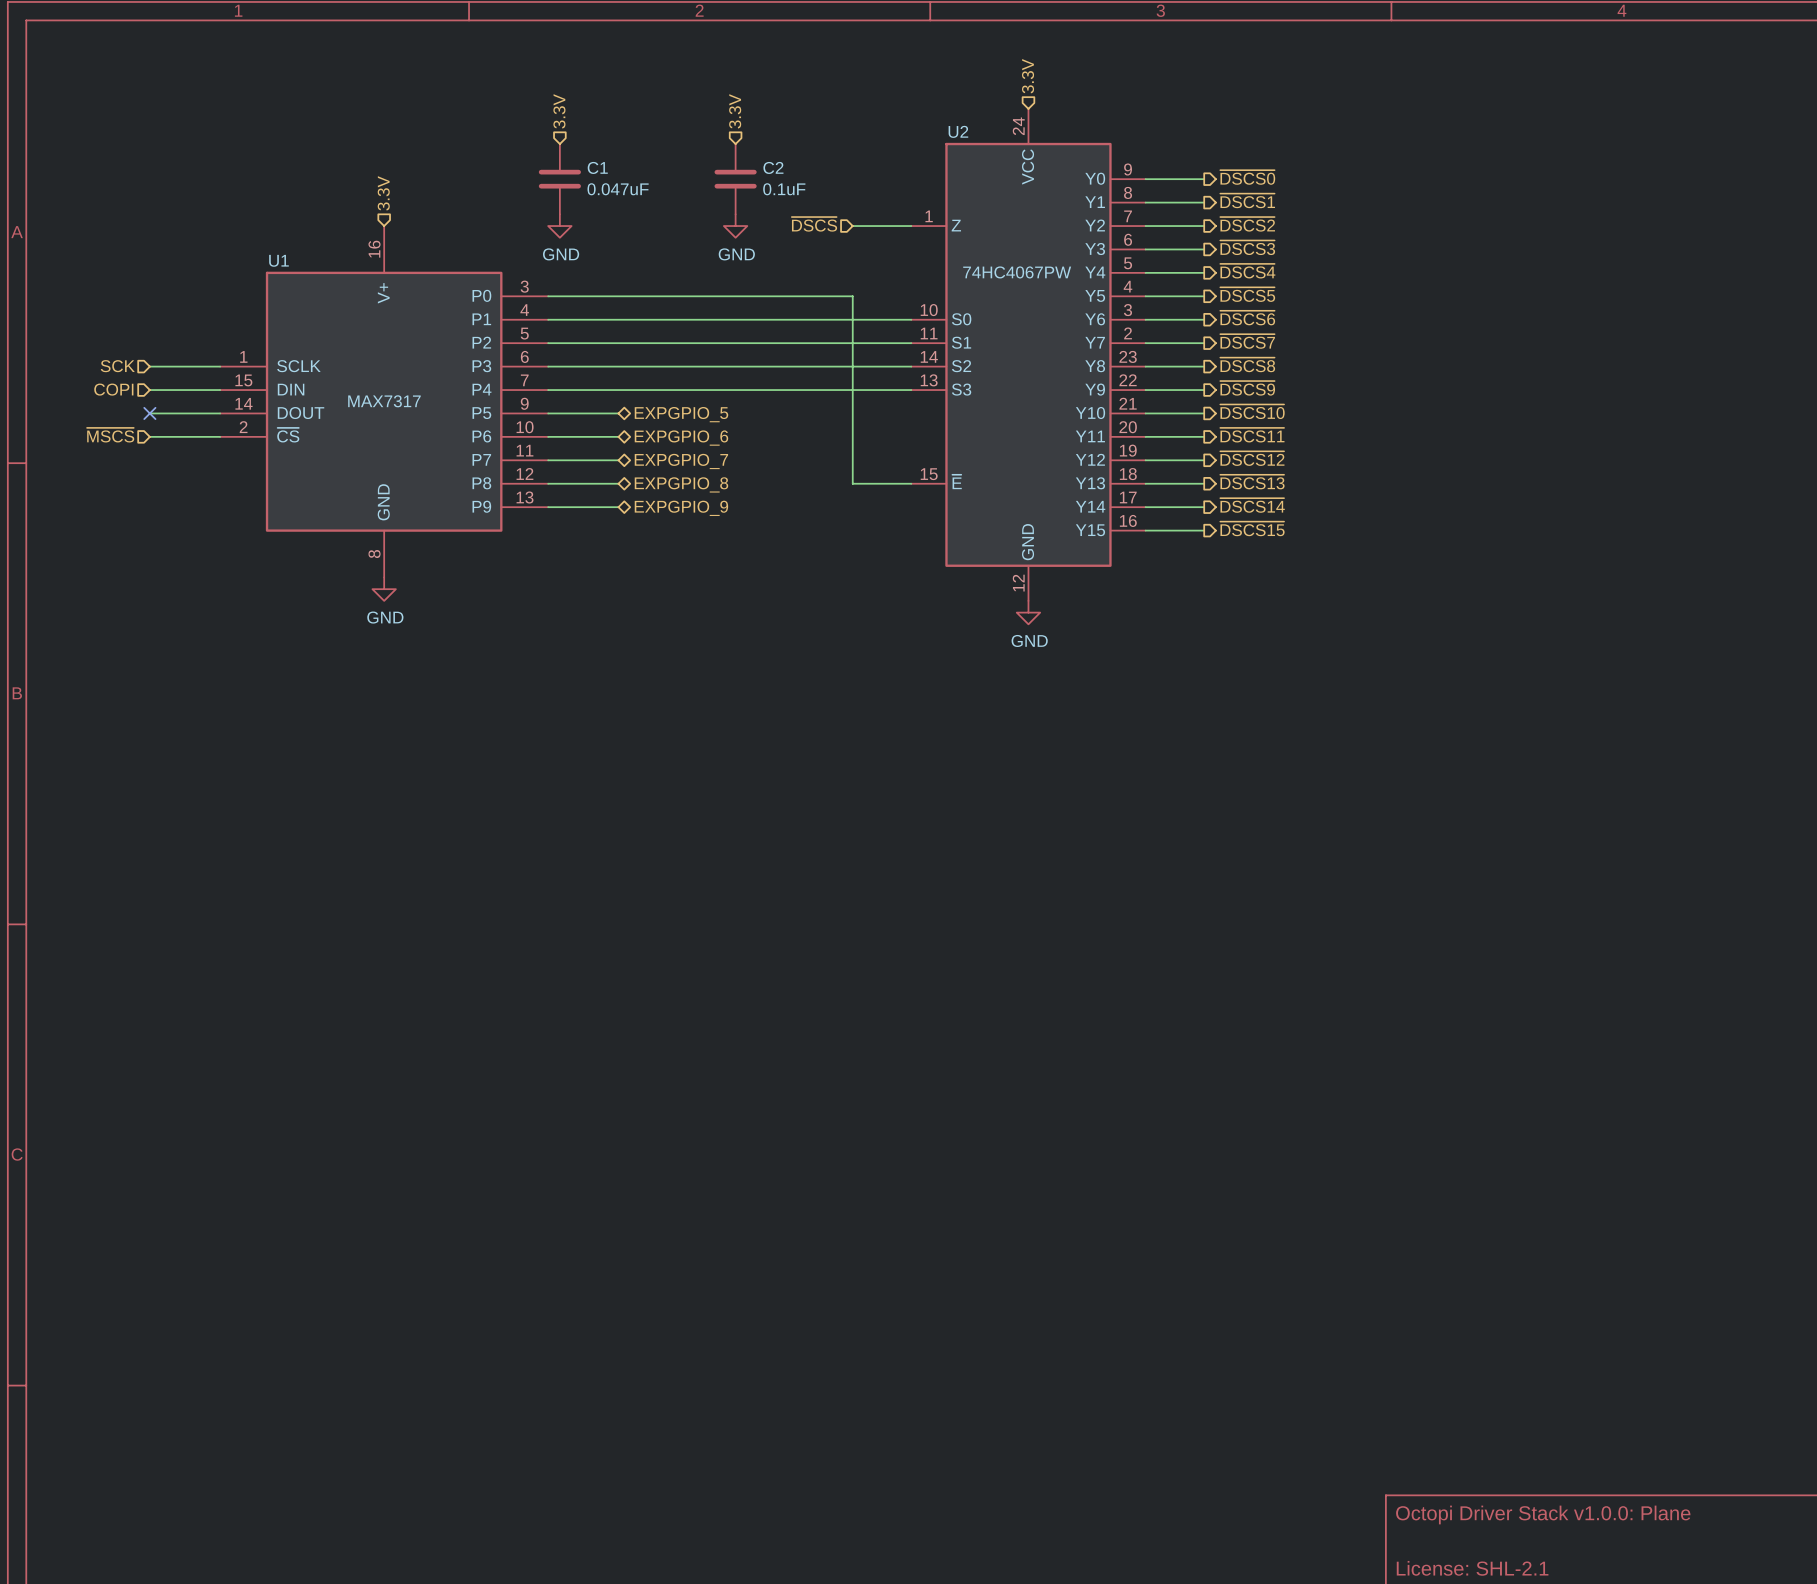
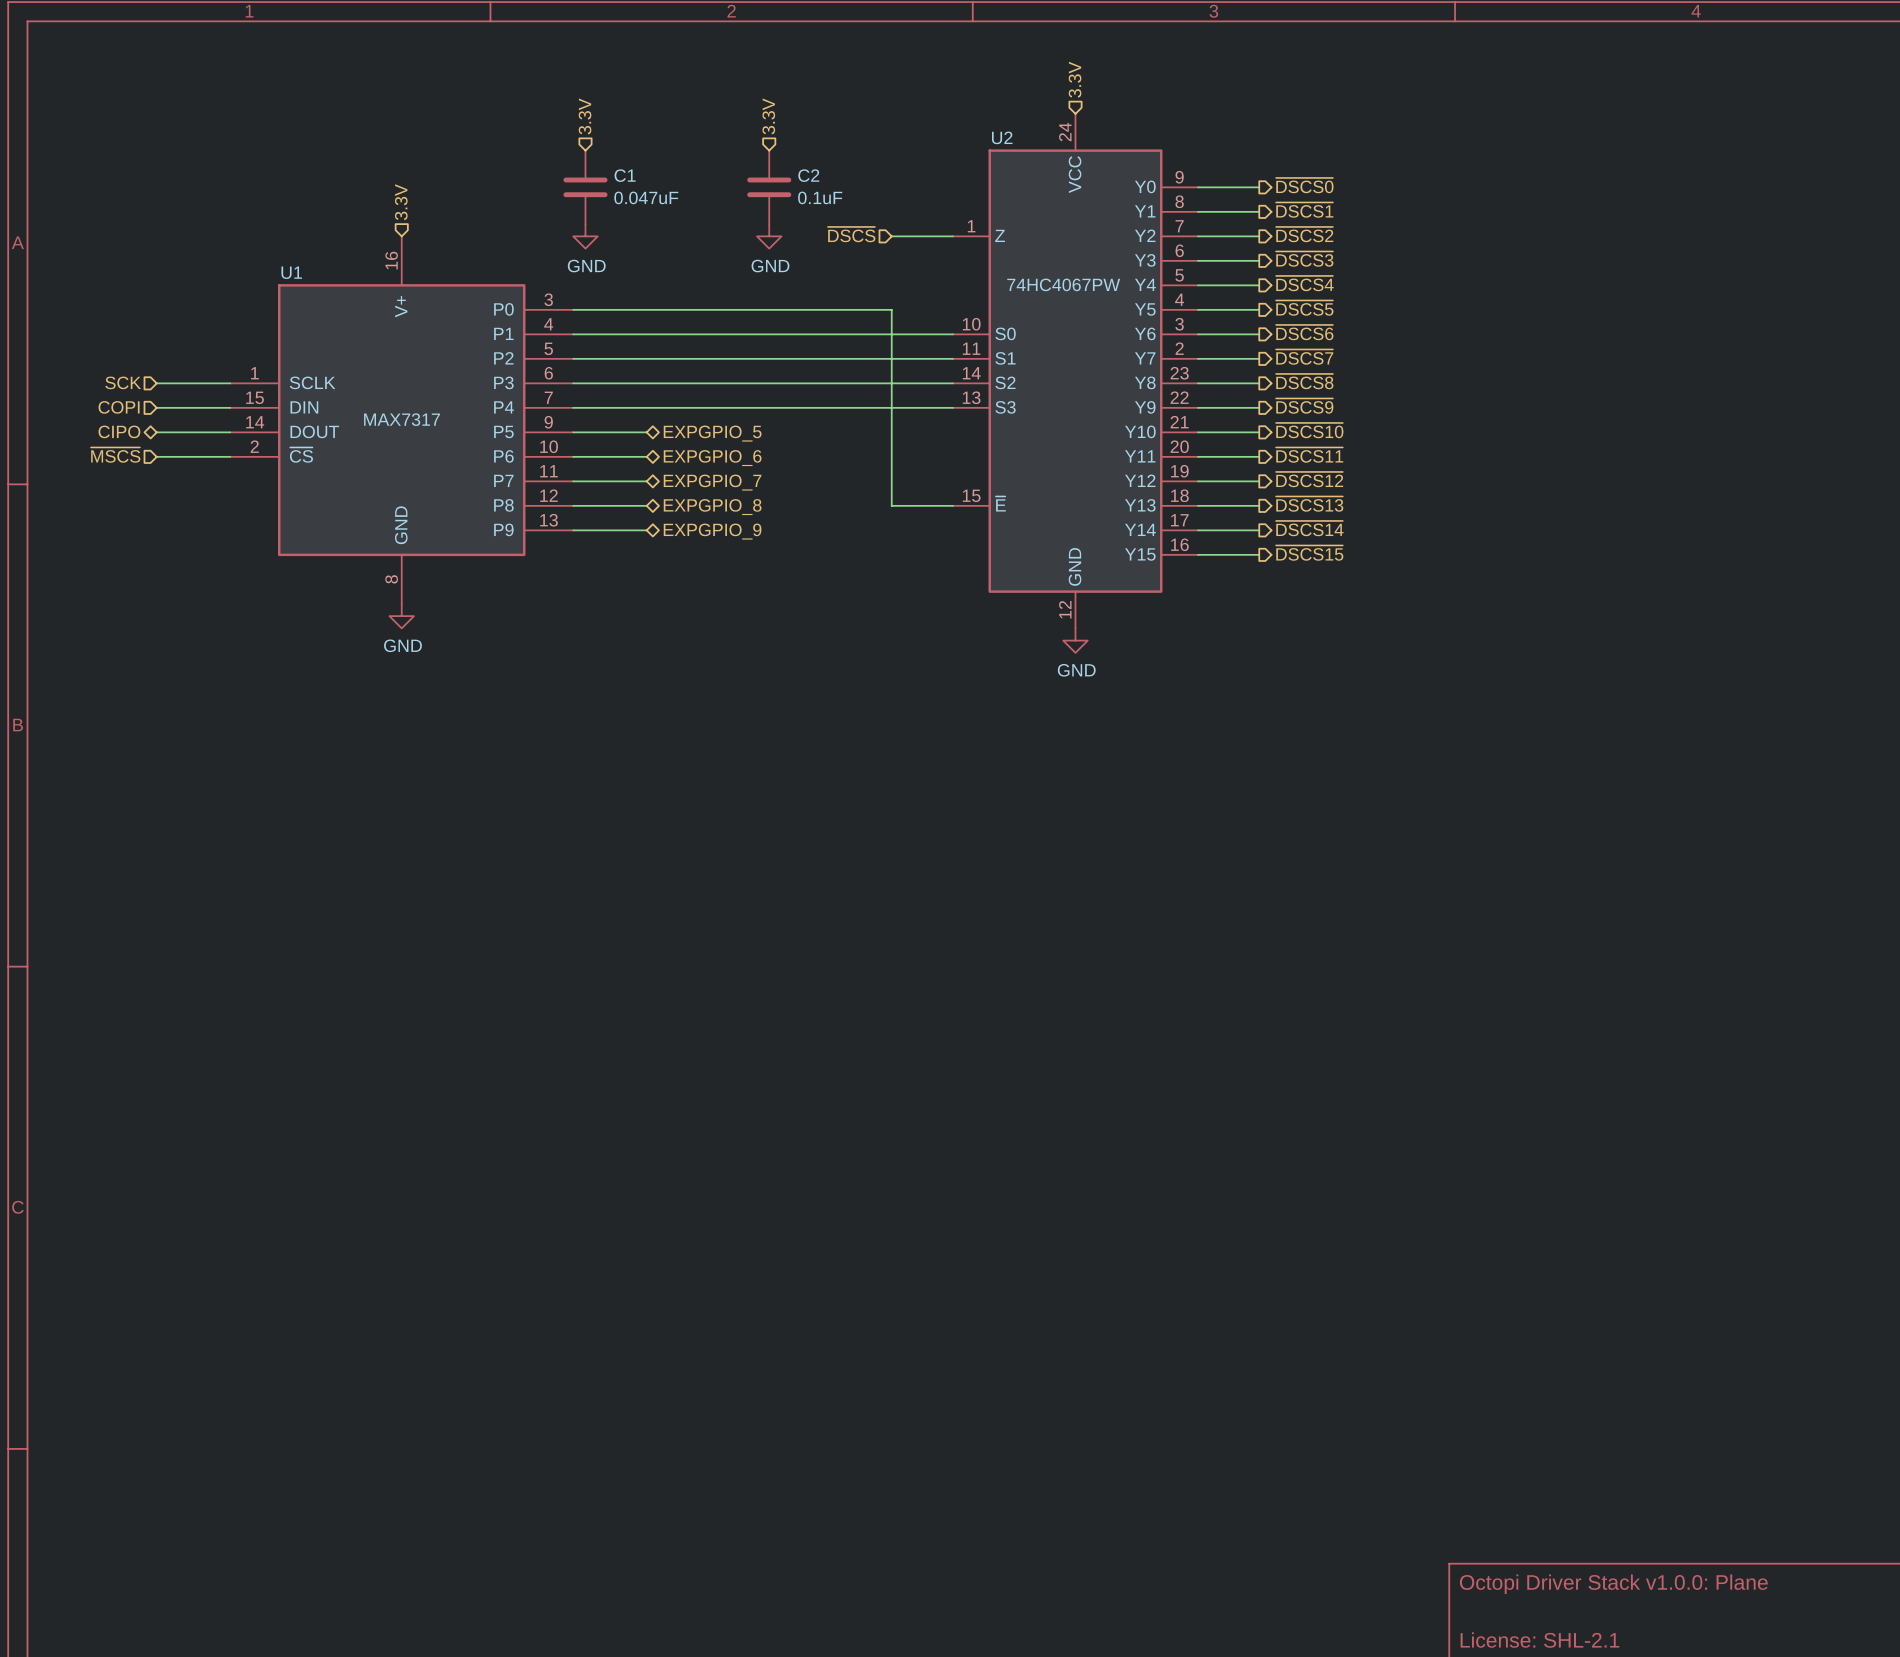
hierarchical label: none -> CIPO (119, 431)
no-connect mark: (149, 413) -> none

